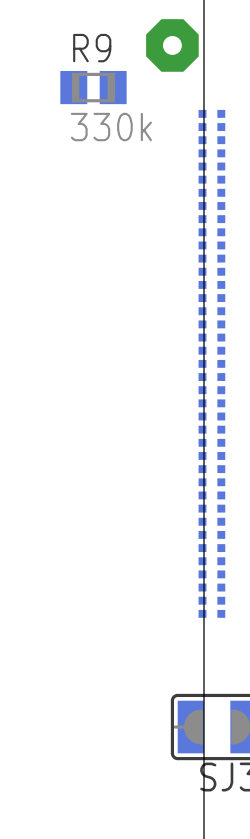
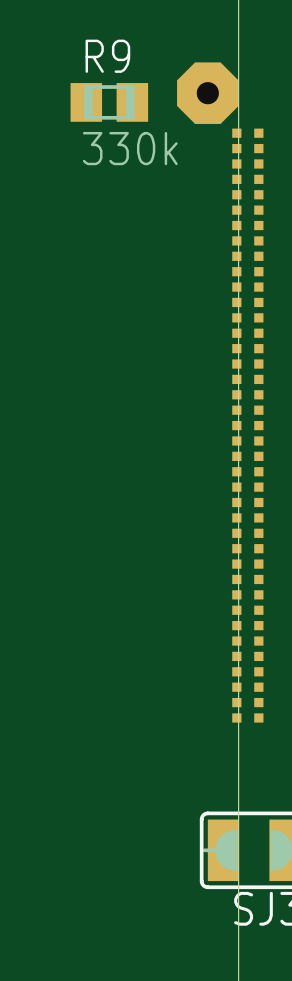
part position: (172, 45) -> (207, 93)

